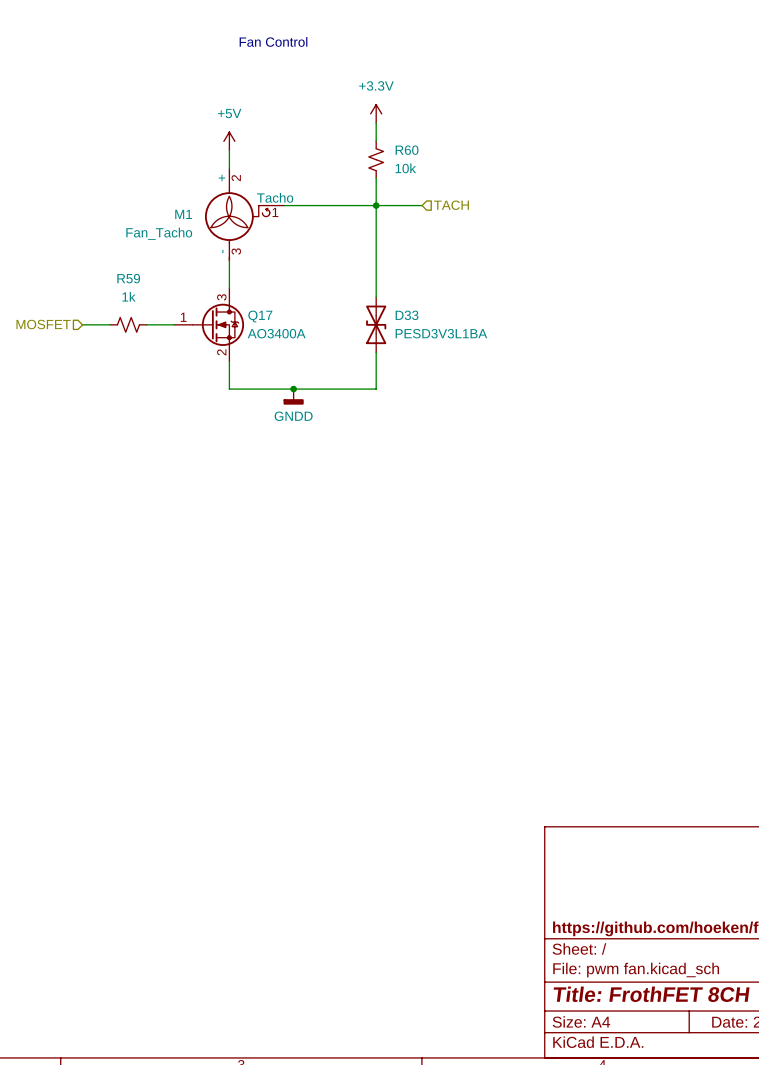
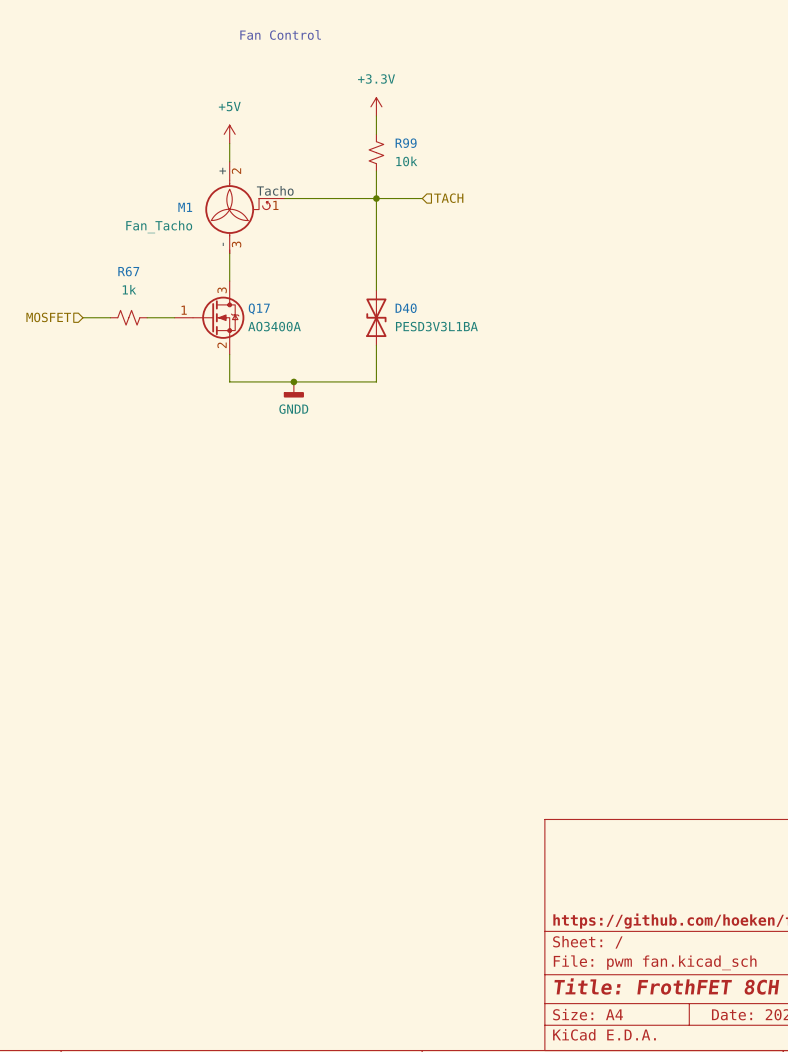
R60 name: R60 (407, 150) -> R99 (406, 143)
R59 name: R59 (128, 278) -> R67 (128, 271)
D33 name: D33 (407, 315) -> D40 (406, 308)

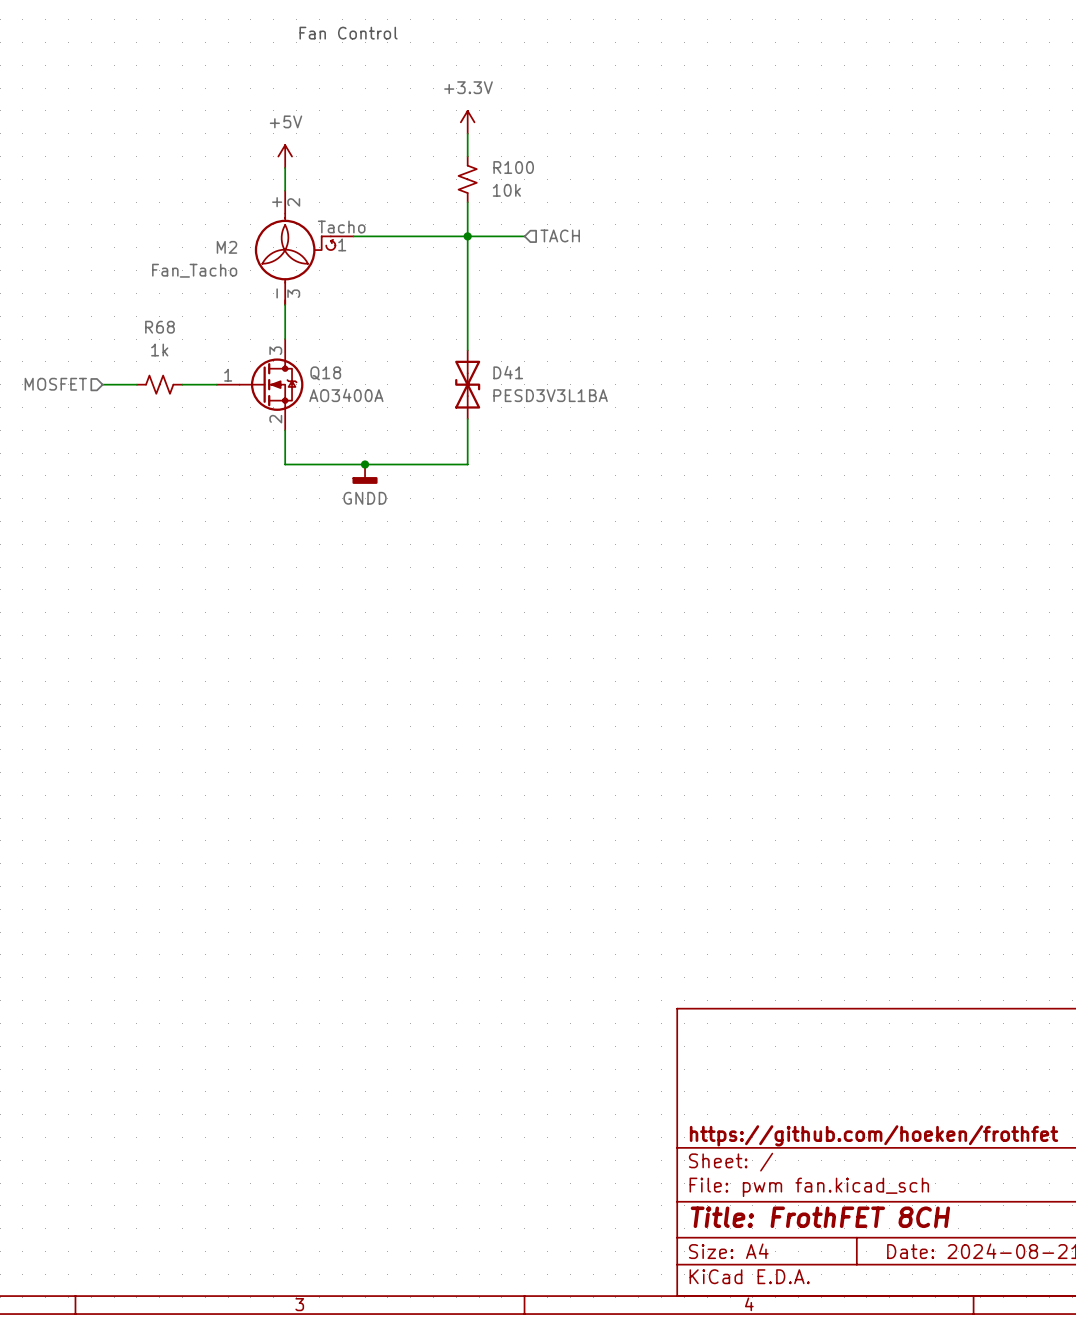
R99 name: R99 (406, 143) -> R100 (513, 167)
M1 name: M1 (185, 207) -> M2 (226, 247)
R67 name: R67 (128, 271) -> R68 (159, 327)
Q17 name: Q17 (259, 308) -> Q18 (325, 373)
D40 name: D40 (406, 308) -> D41 (508, 372)

